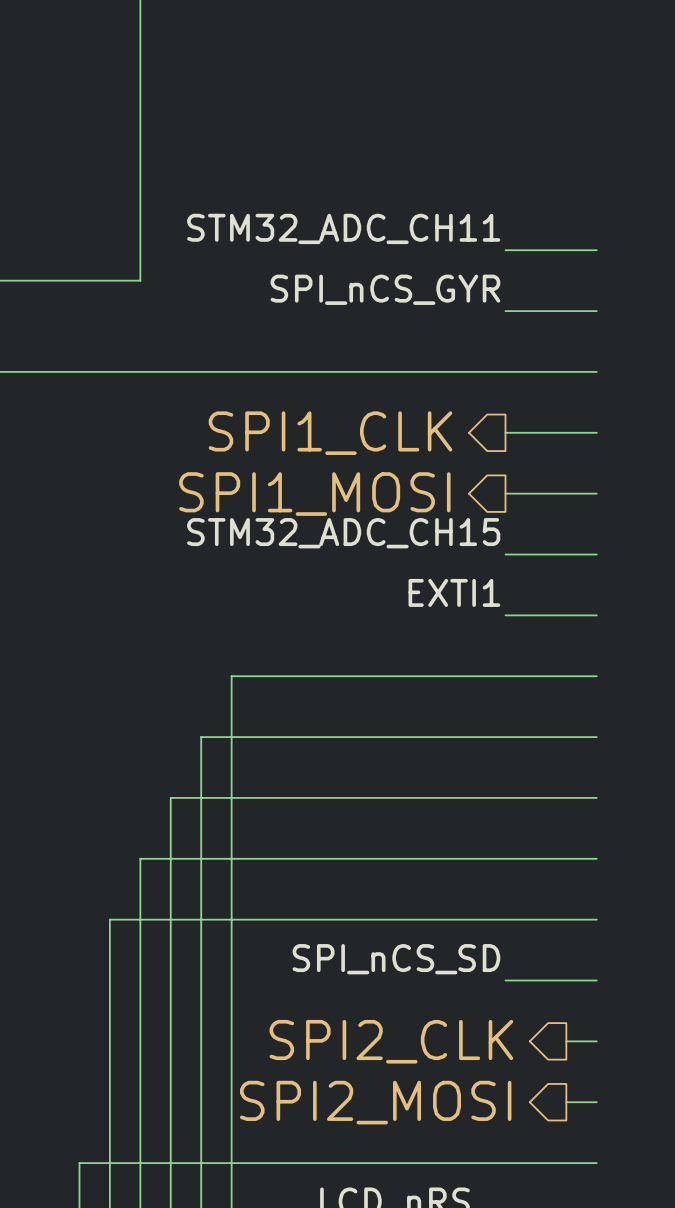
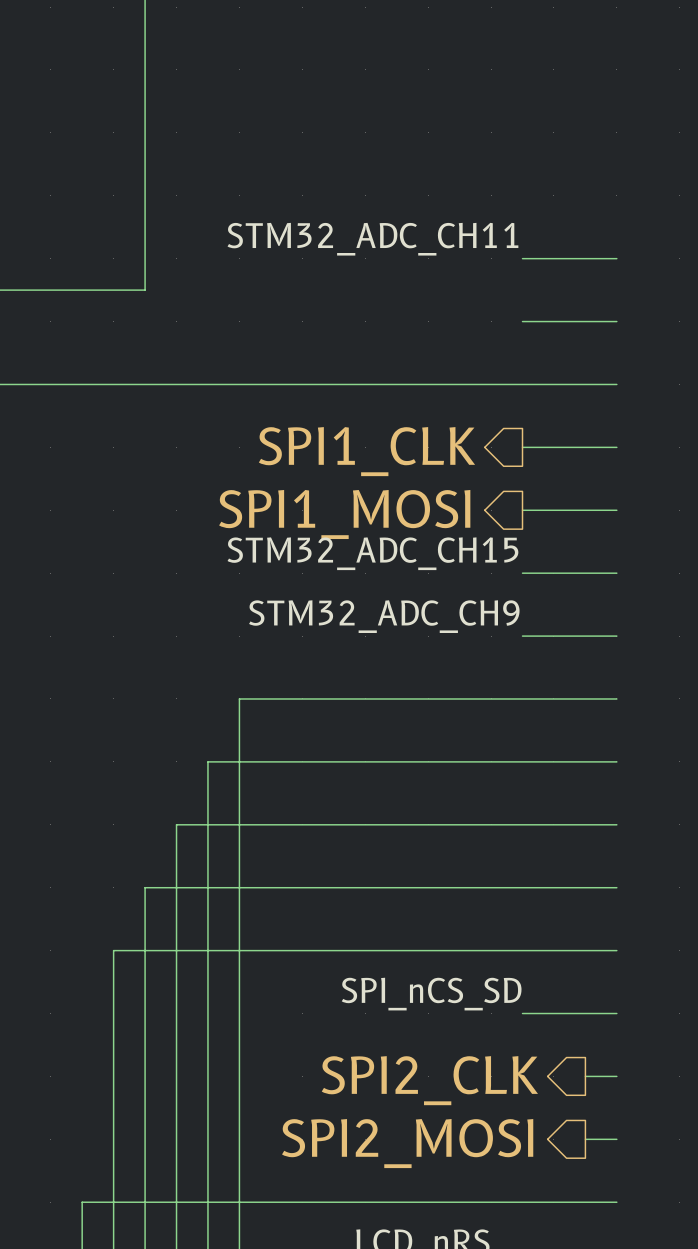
label: SPI_nCS_GYR (385, 289) -> none
label: EXTI1 (454, 592) -> STM32_ADC_CH9 (384, 616)

